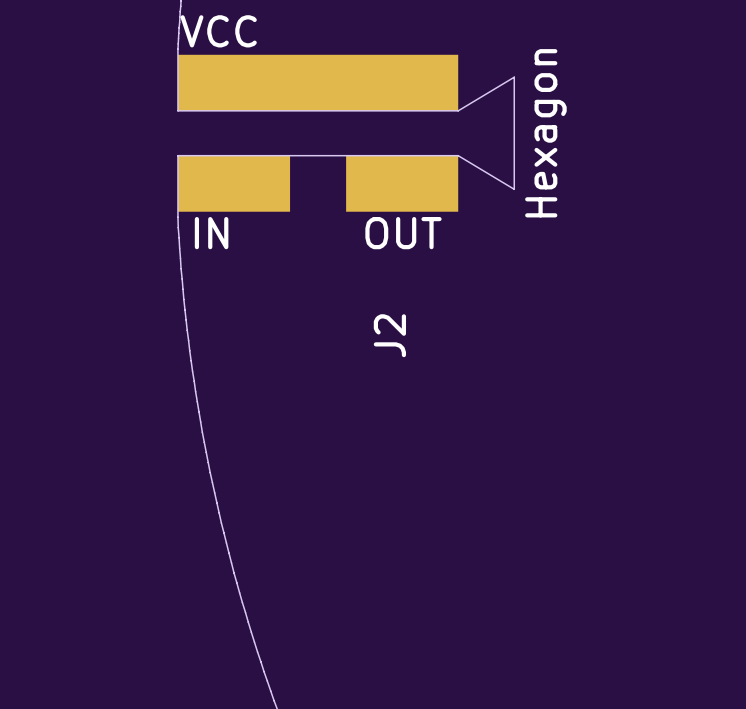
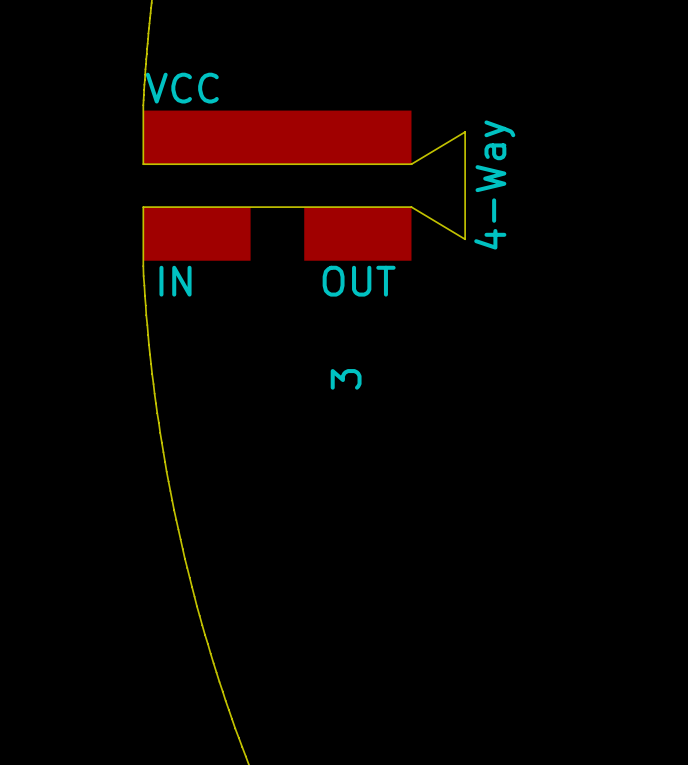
J2 value: Hexagon (545, 133) -> 4-Way (494, 185)
J2 name: J2 (389, 335) -> 3 (346, 379)

